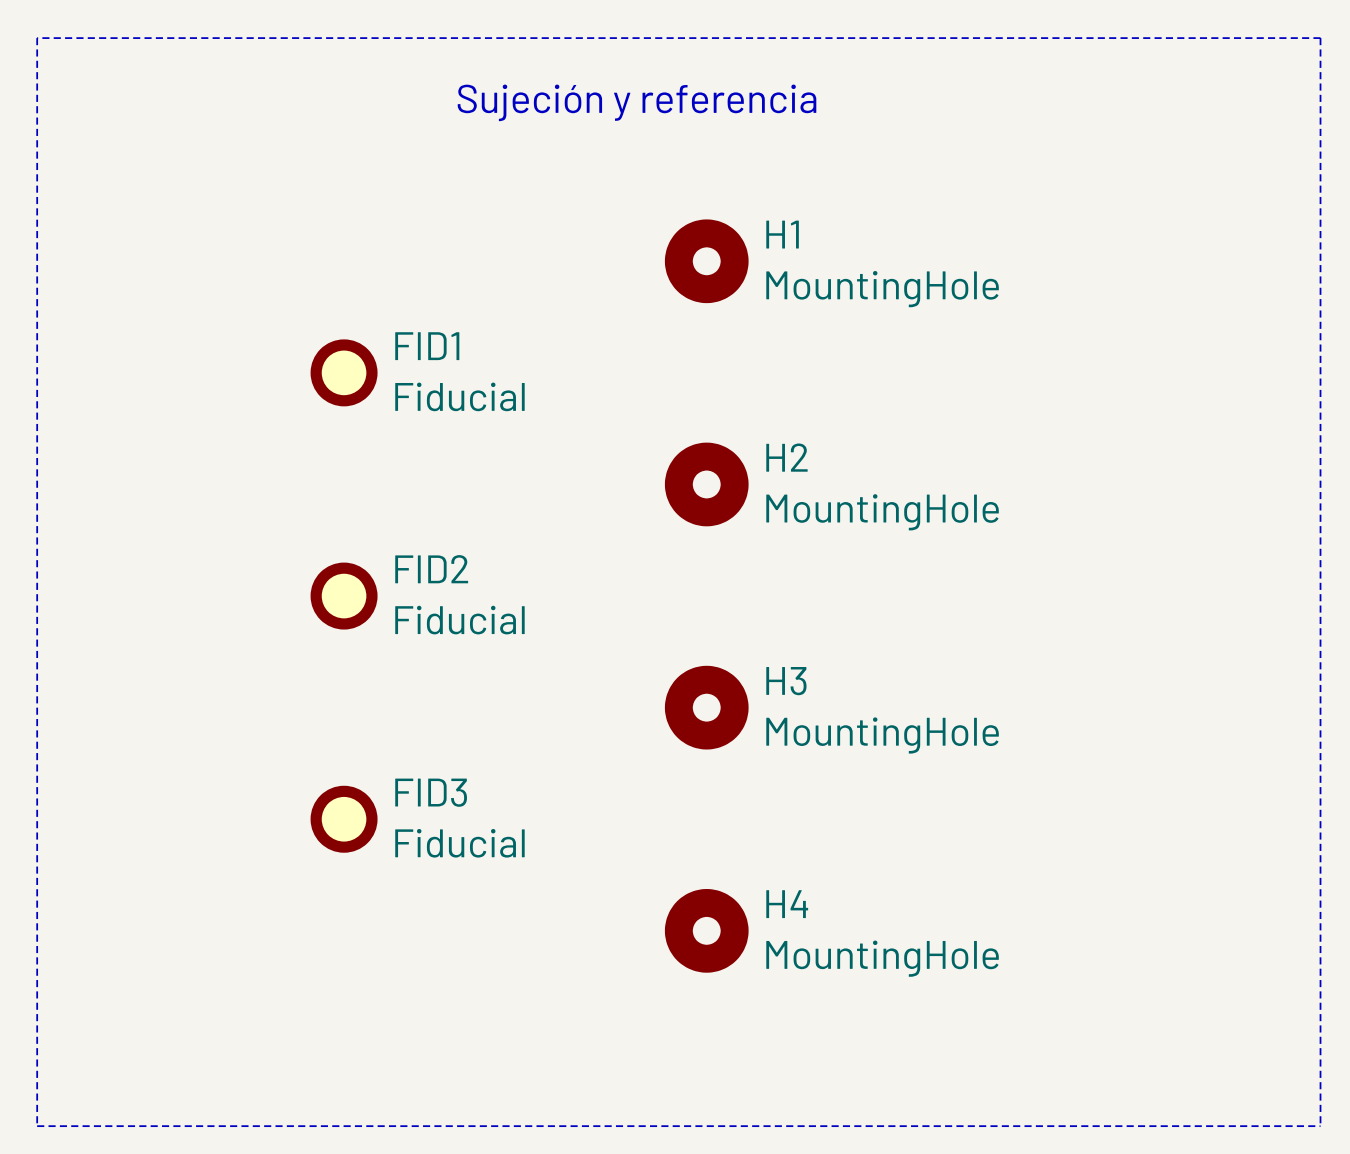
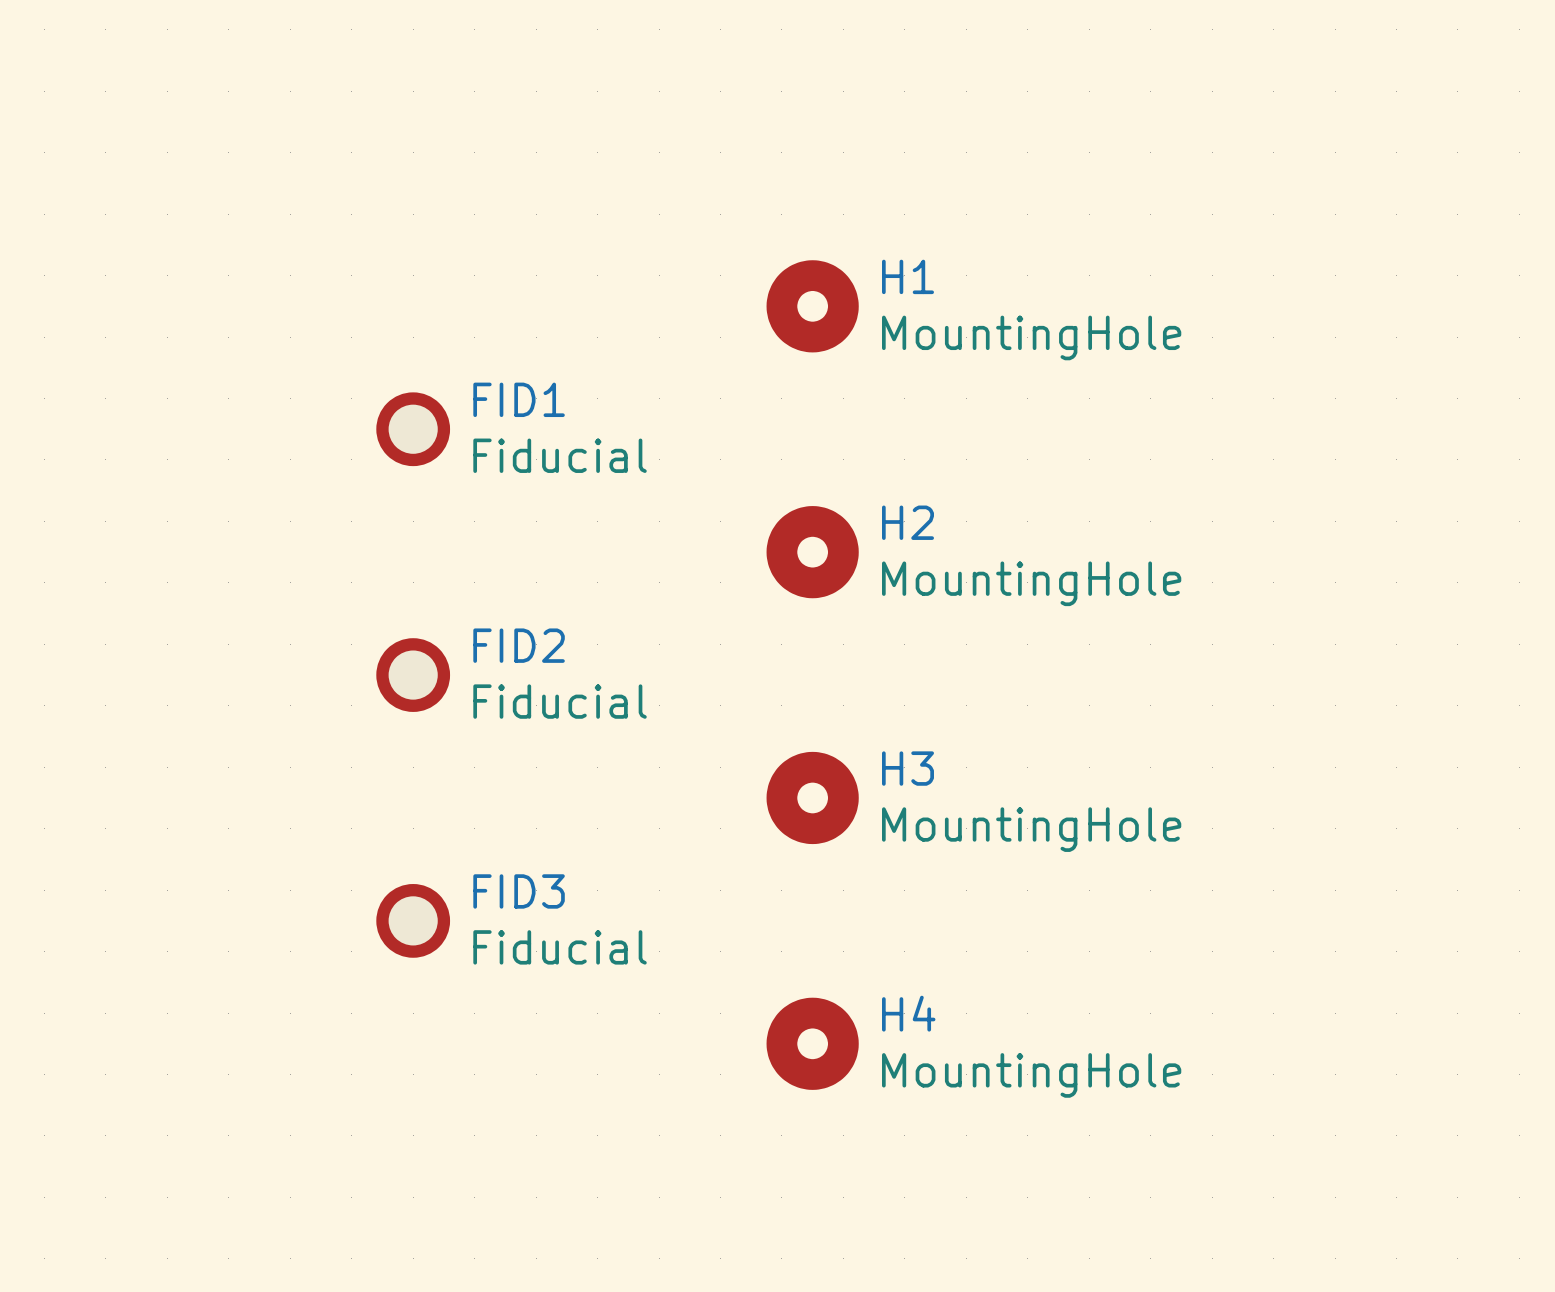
line: (37, 38) (37, 1126) (1320, 1126) (1320, 38) (37, 38) -> none
text: Sujeción y referencia (637, 102) -> none

